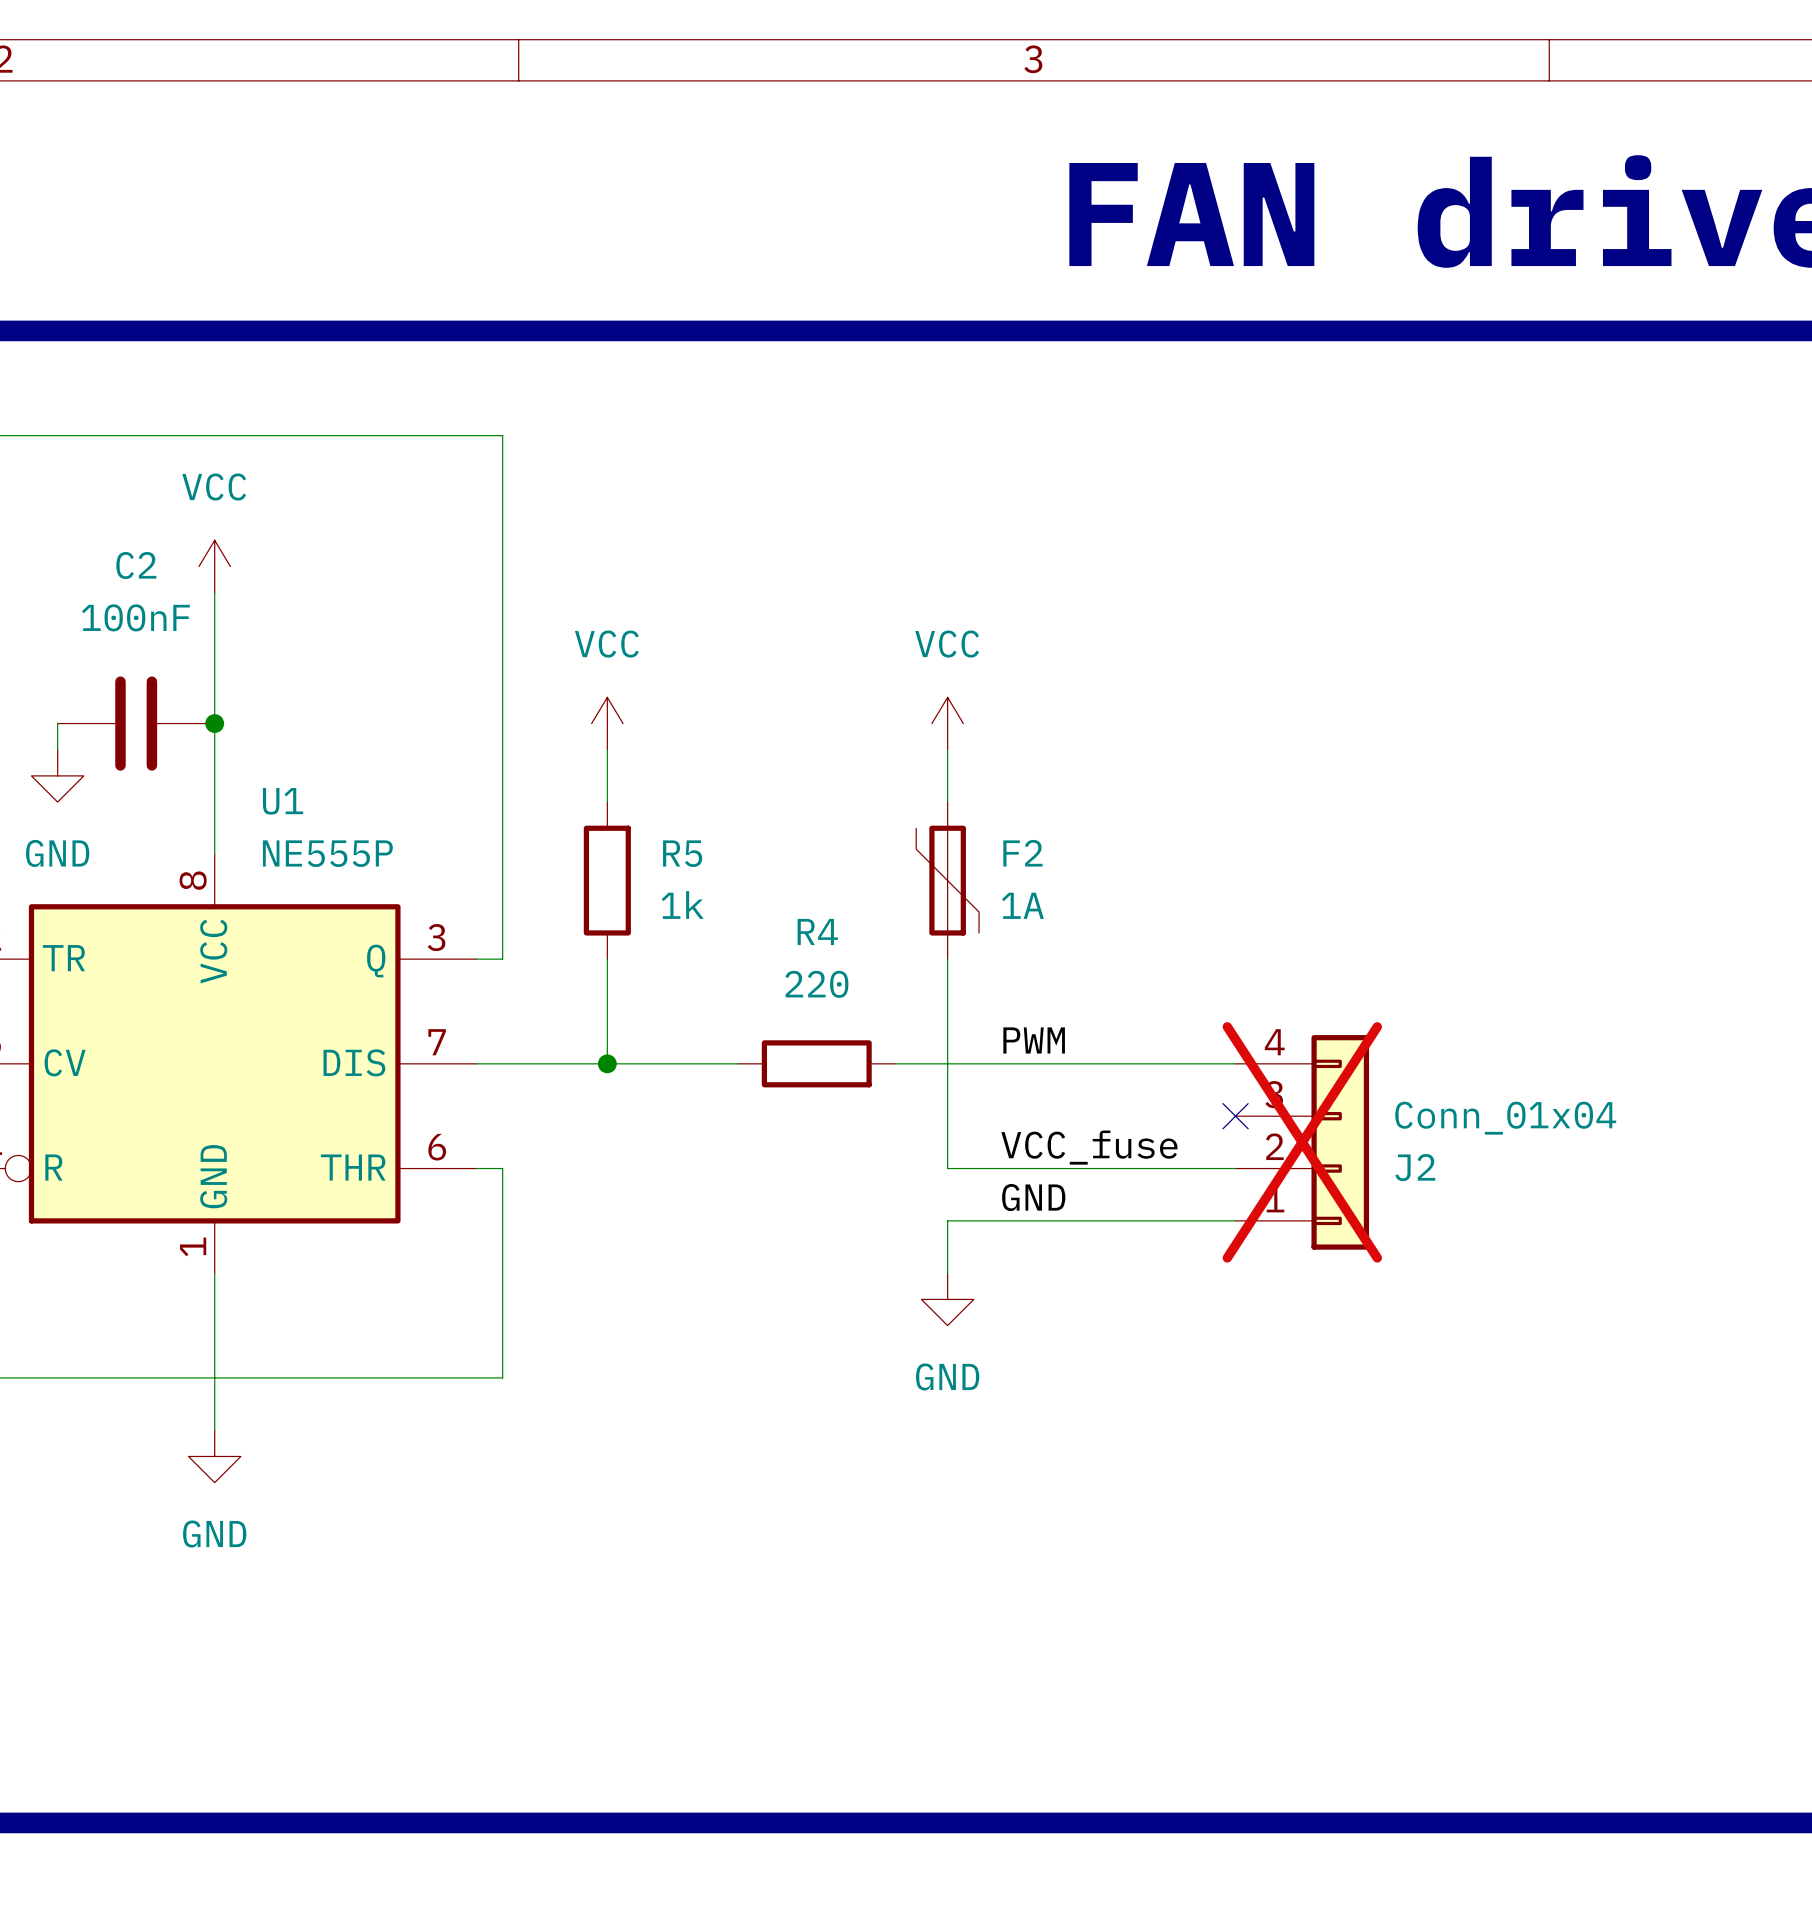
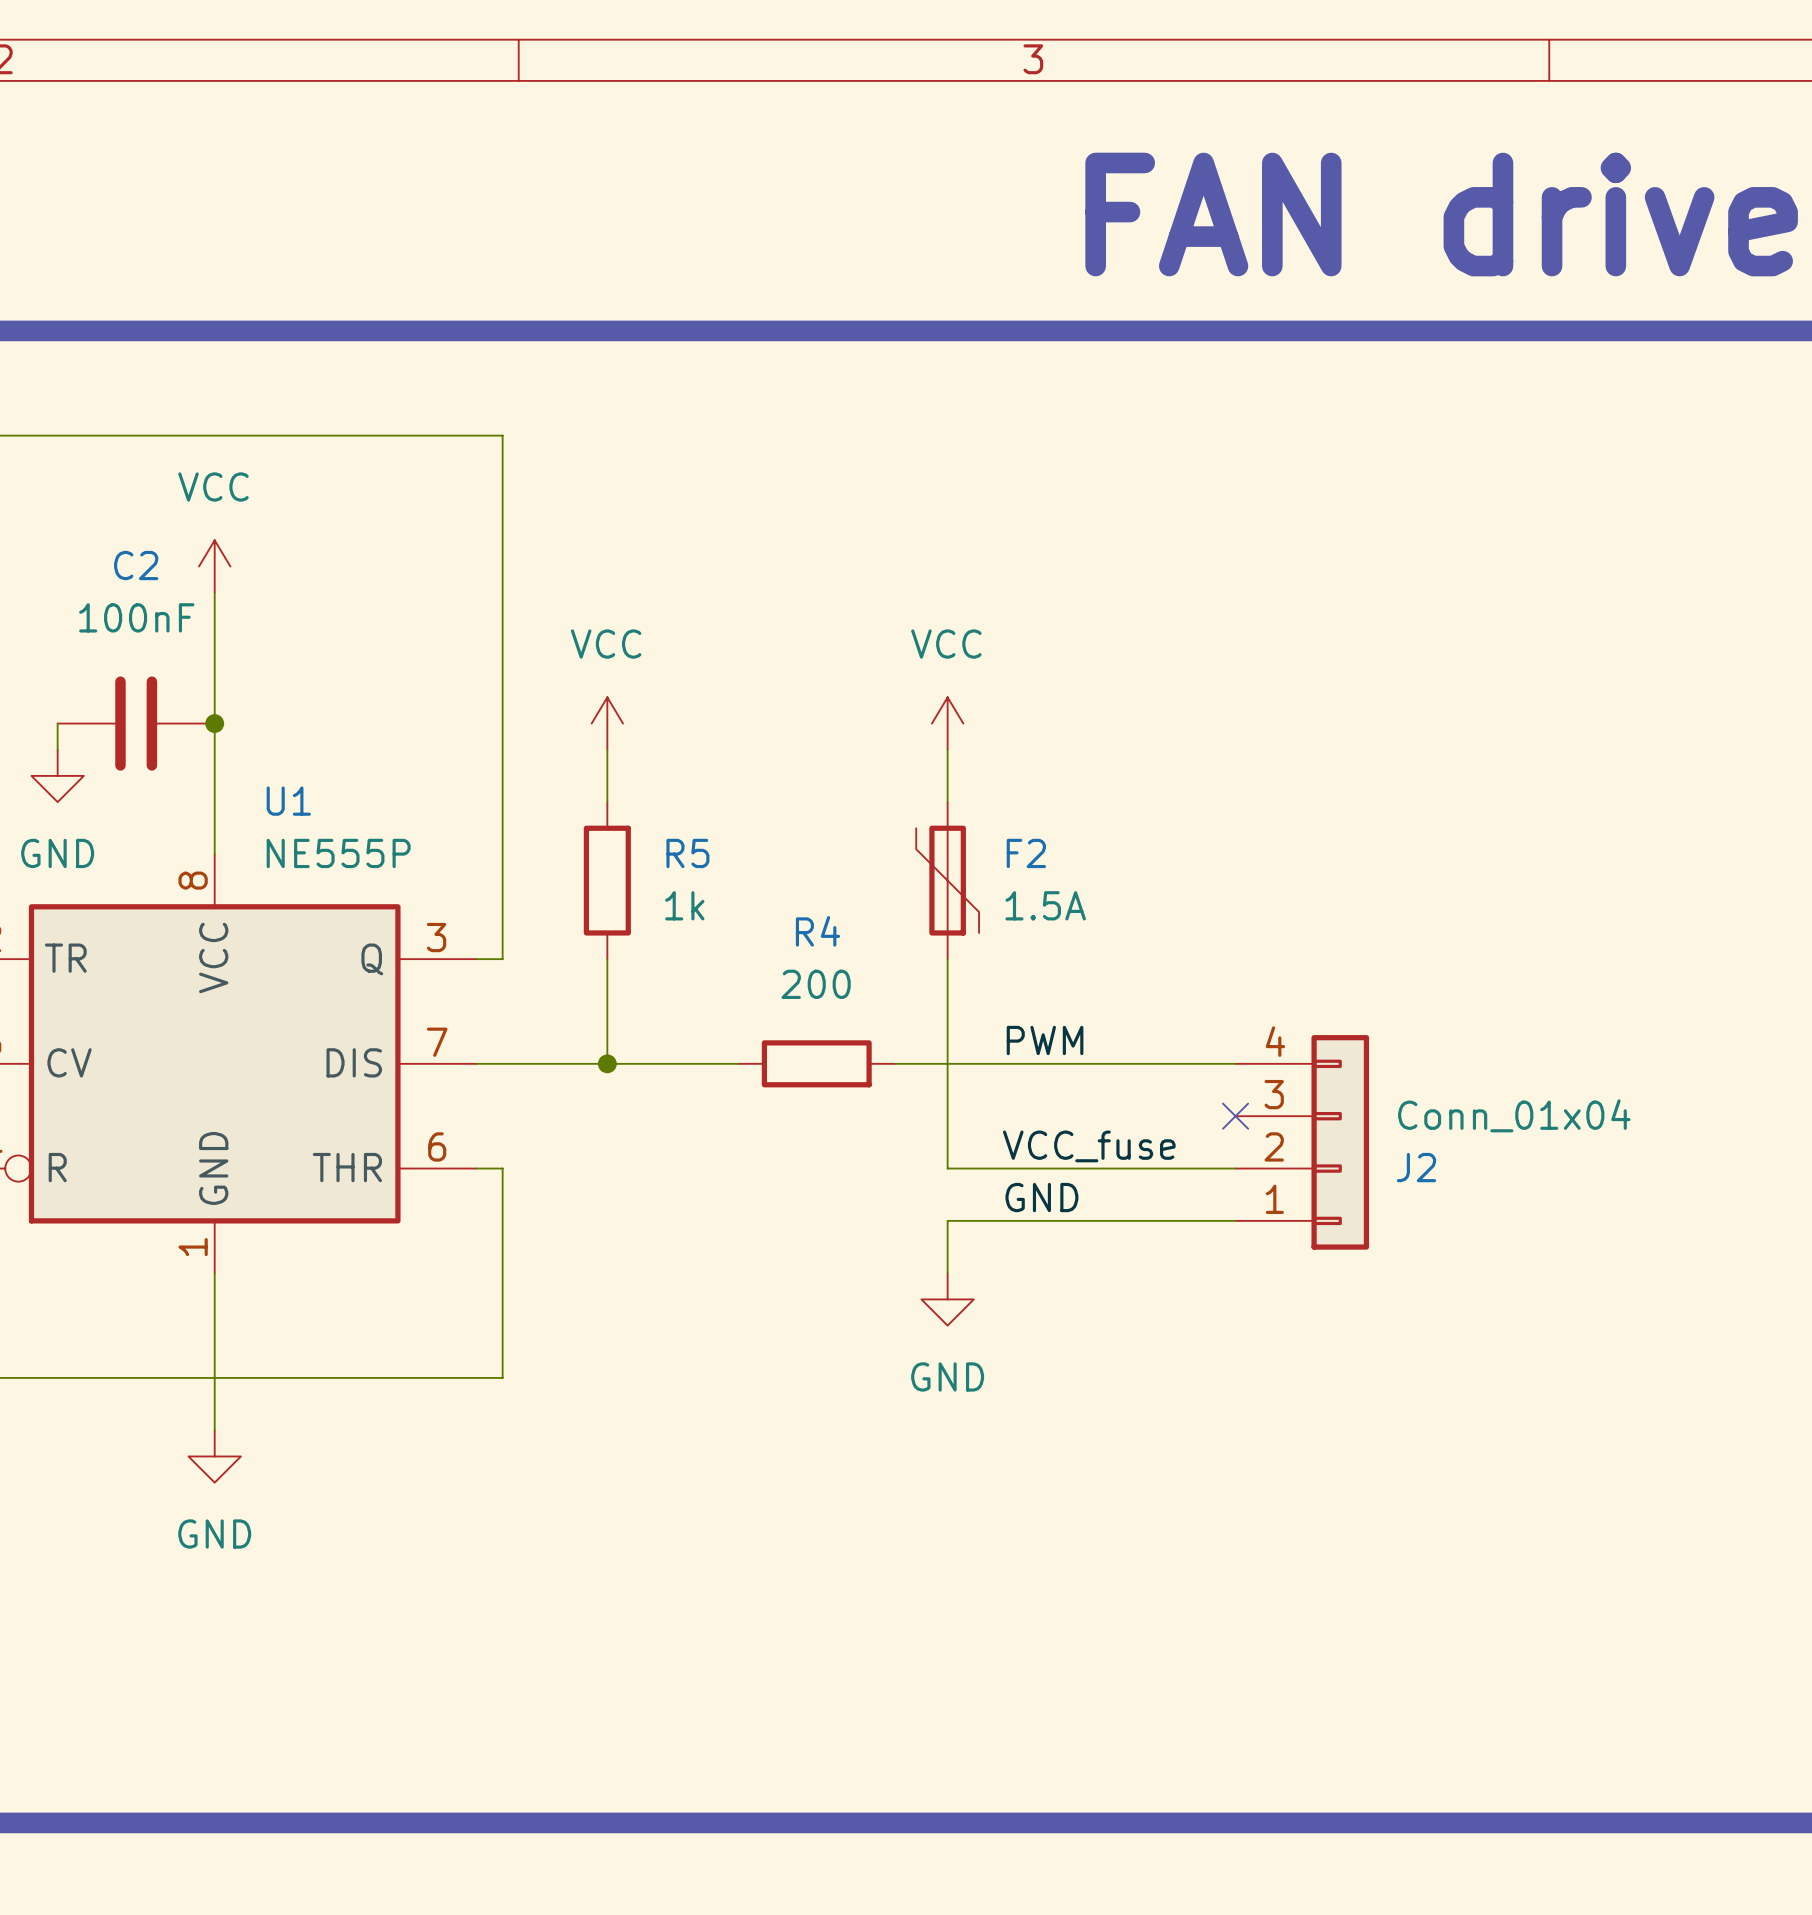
F2 value: 1A (1022, 905) -> 1.5A (1045, 905)
R4 value: 220 (816, 984) -> 200 (816, 984)
J2 do-not-place cross: (1302, 1142) -> none

